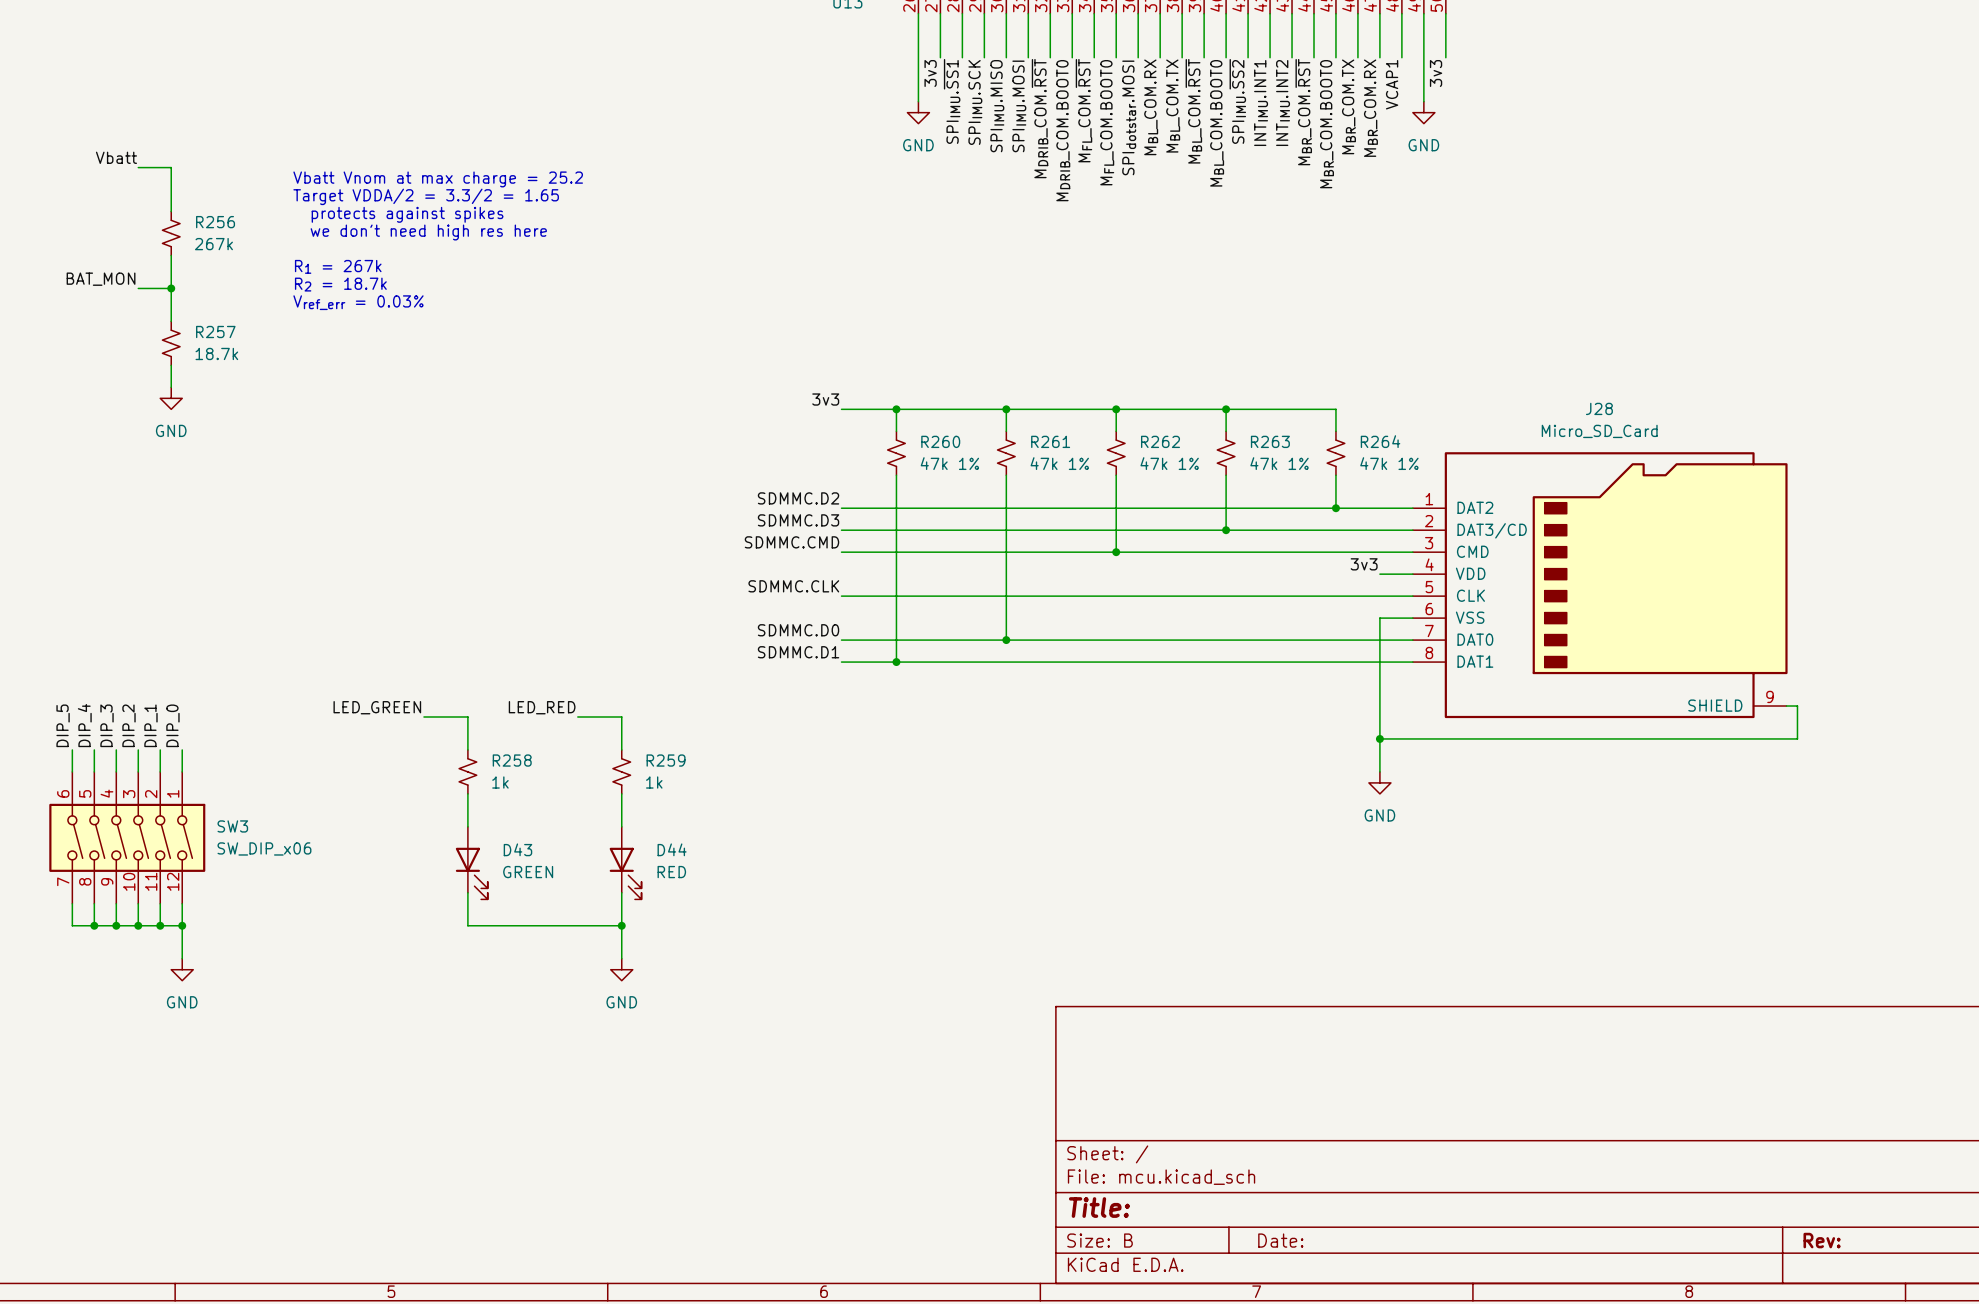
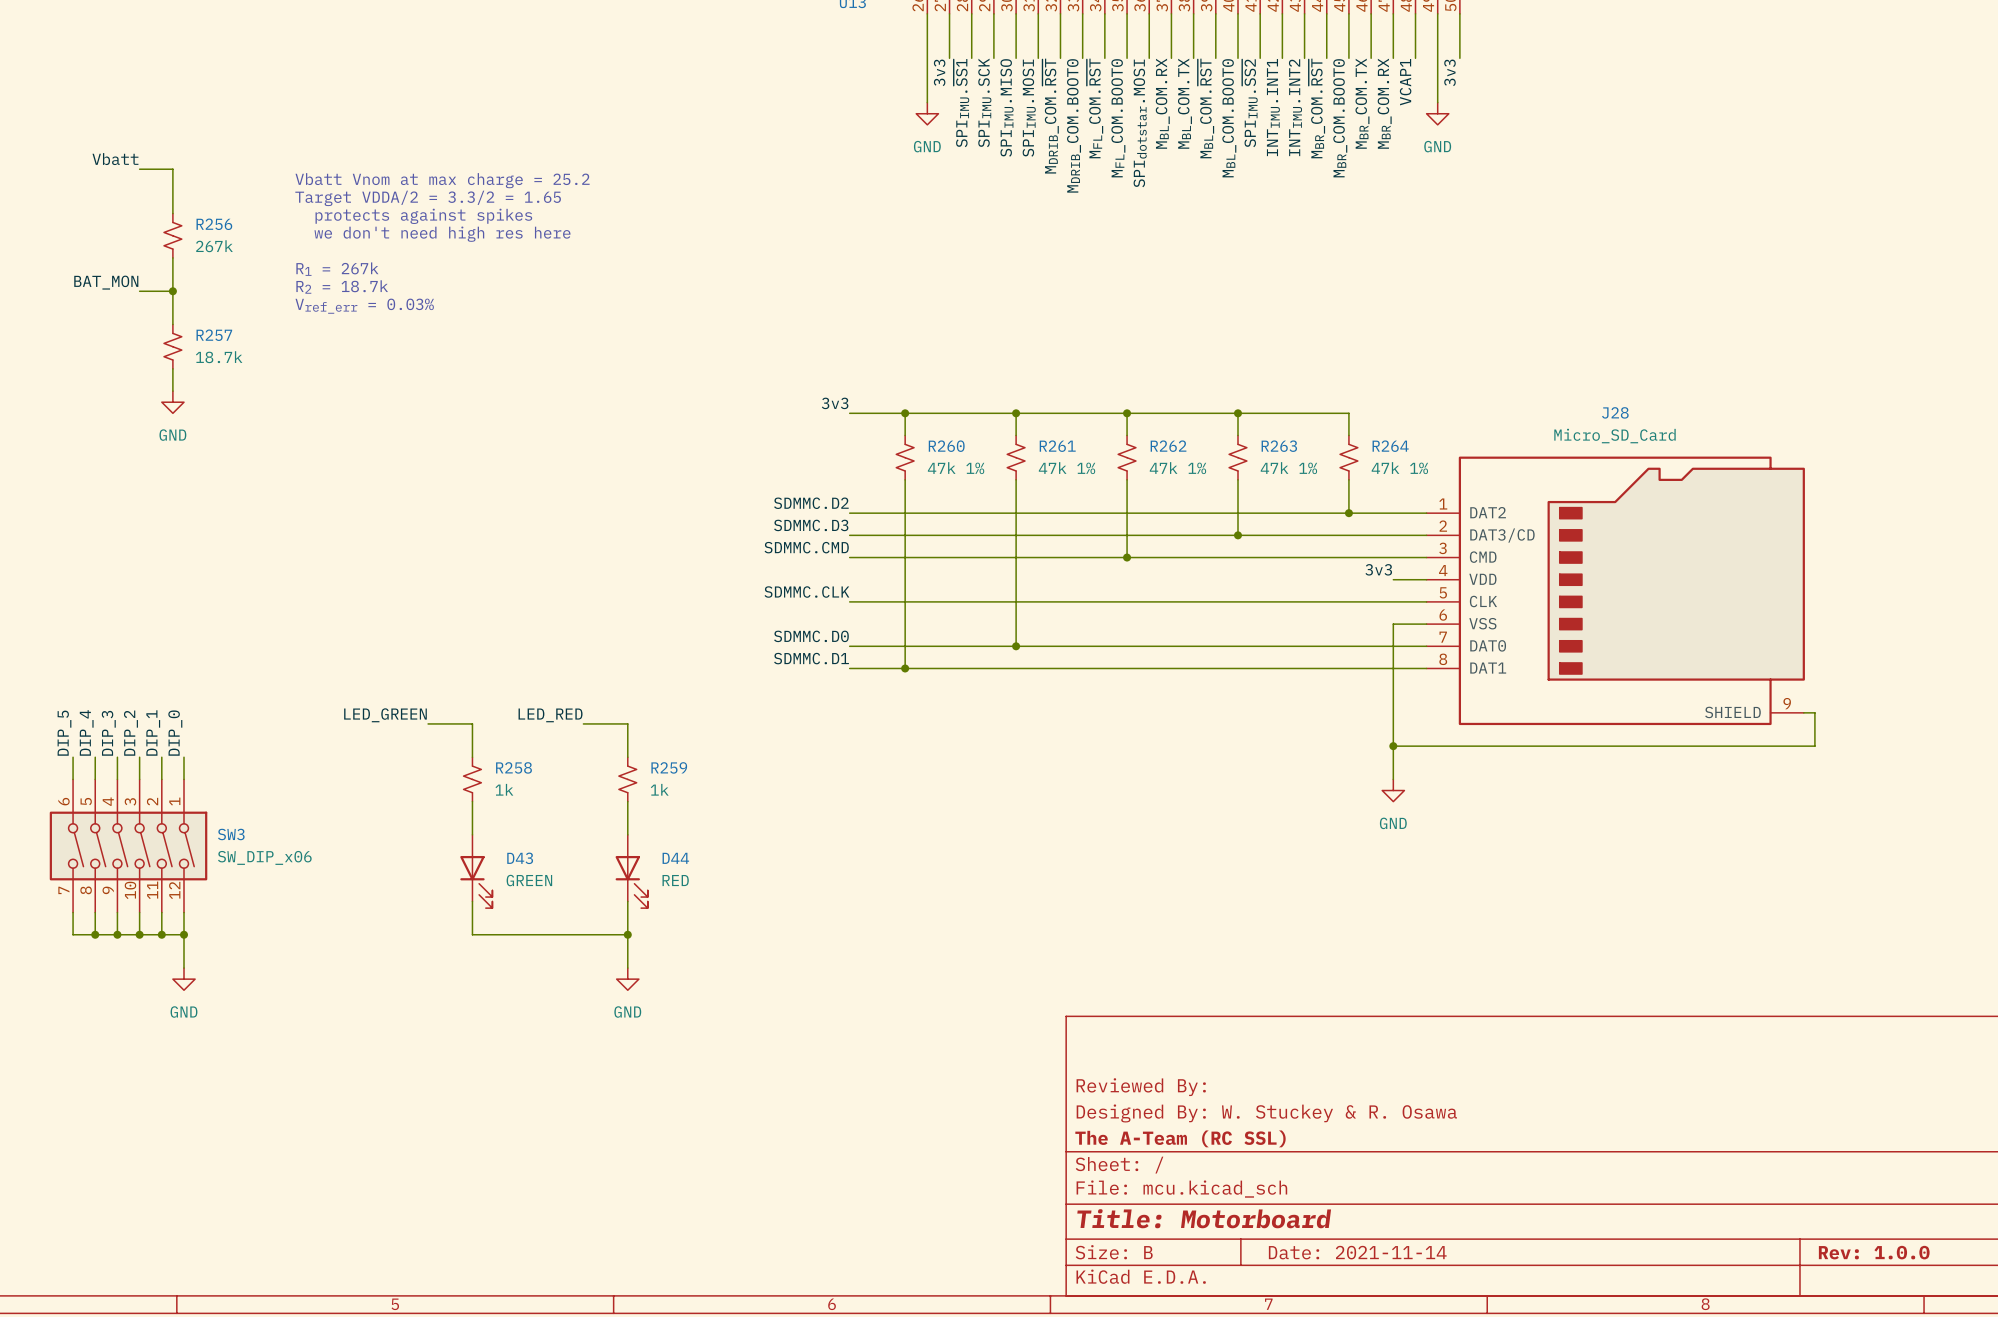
title block: none -> Reviewed By: (1141, 1087)
title block: none -> Designed By: W. Stuckey & R. Osawa (1266, 1113)
title block: none -> The A-Team (RC SSL) (1180, 1138)
title block: Title: (1099, 1207) -> Title: Motorboard (1204, 1218)
title block: Date: (1280, 1240) -> Date: 2021-11-14 (1357, 1252)
title block: Rev: (1822, 1240) -> Rev: 1.0.0 (1874, 1252)

